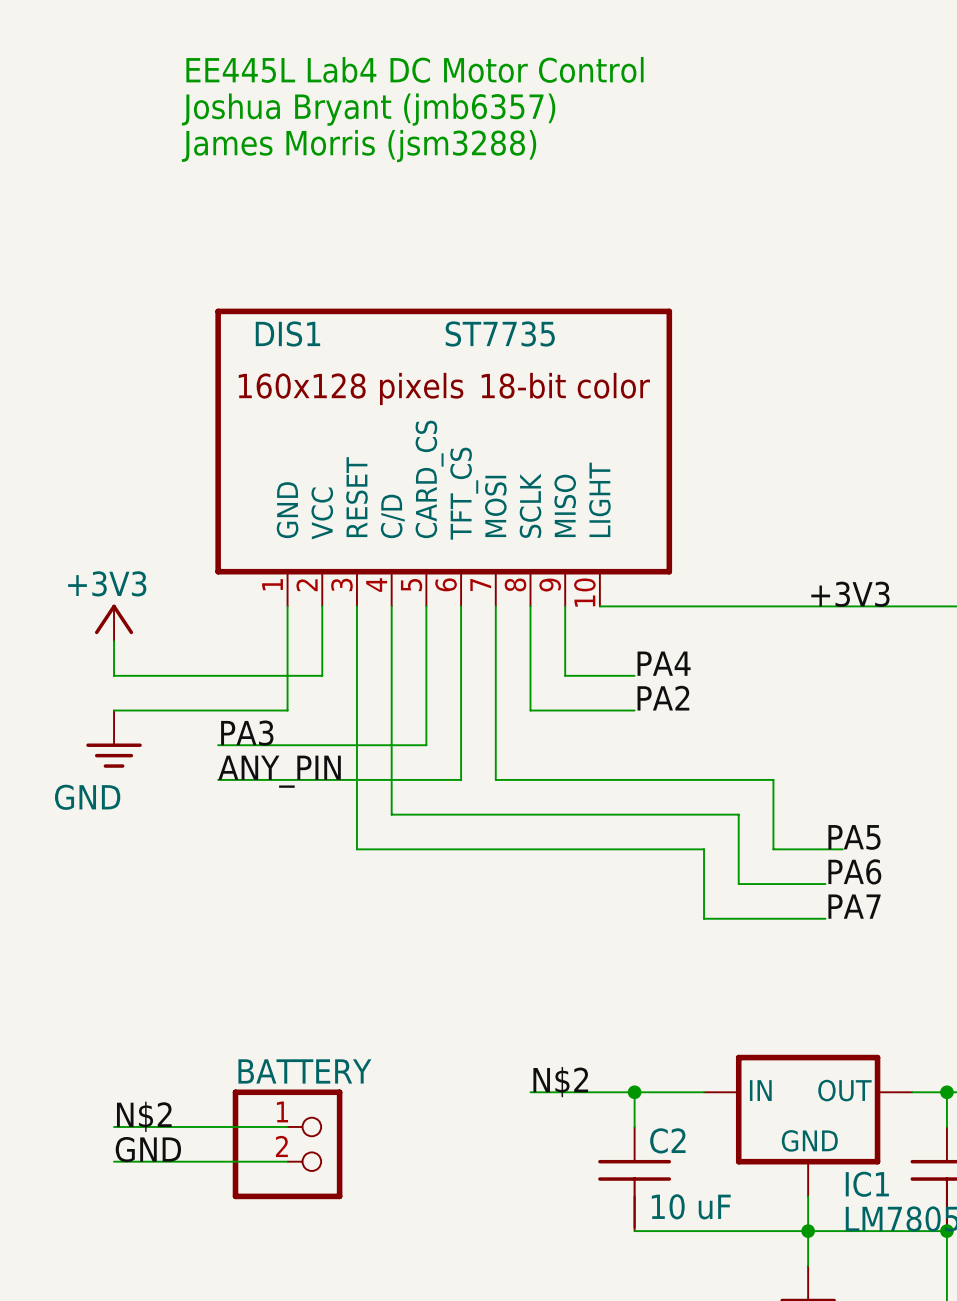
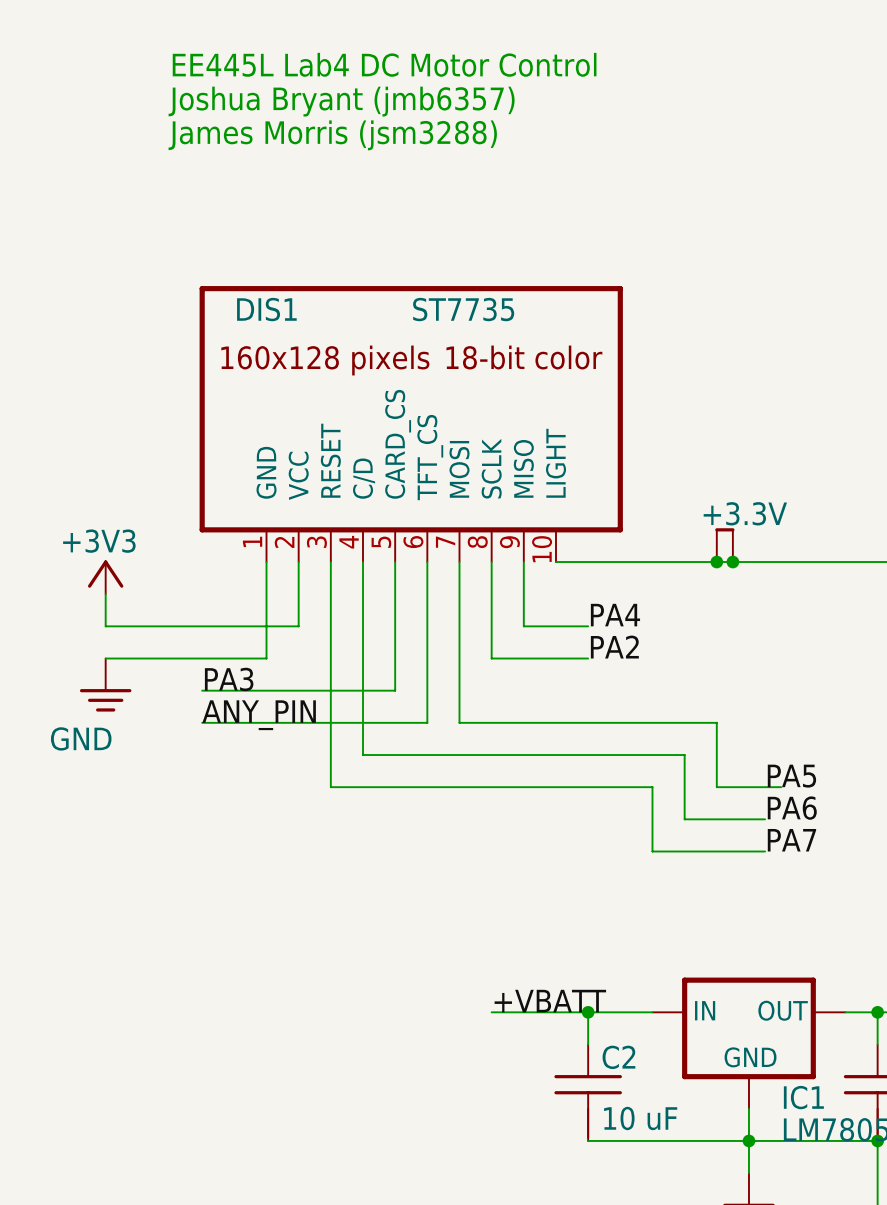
+3.3V: none -> (724, 545)
label: +3V3 (850, 594) -> none
junction: none -> (716, 562)
junction: none -> (732, 562)
label: N$2 (560, 1082) -> +VBATT (550, 1001)
label: N$2 (144, 1116) -> none
wire: (114, 1126) (287, 1126) -> none
BATTERY: (287, 1144) -> none
label: GND (148, 1149) -> none
wire: (114, 1161) (287, 1161) -> none

